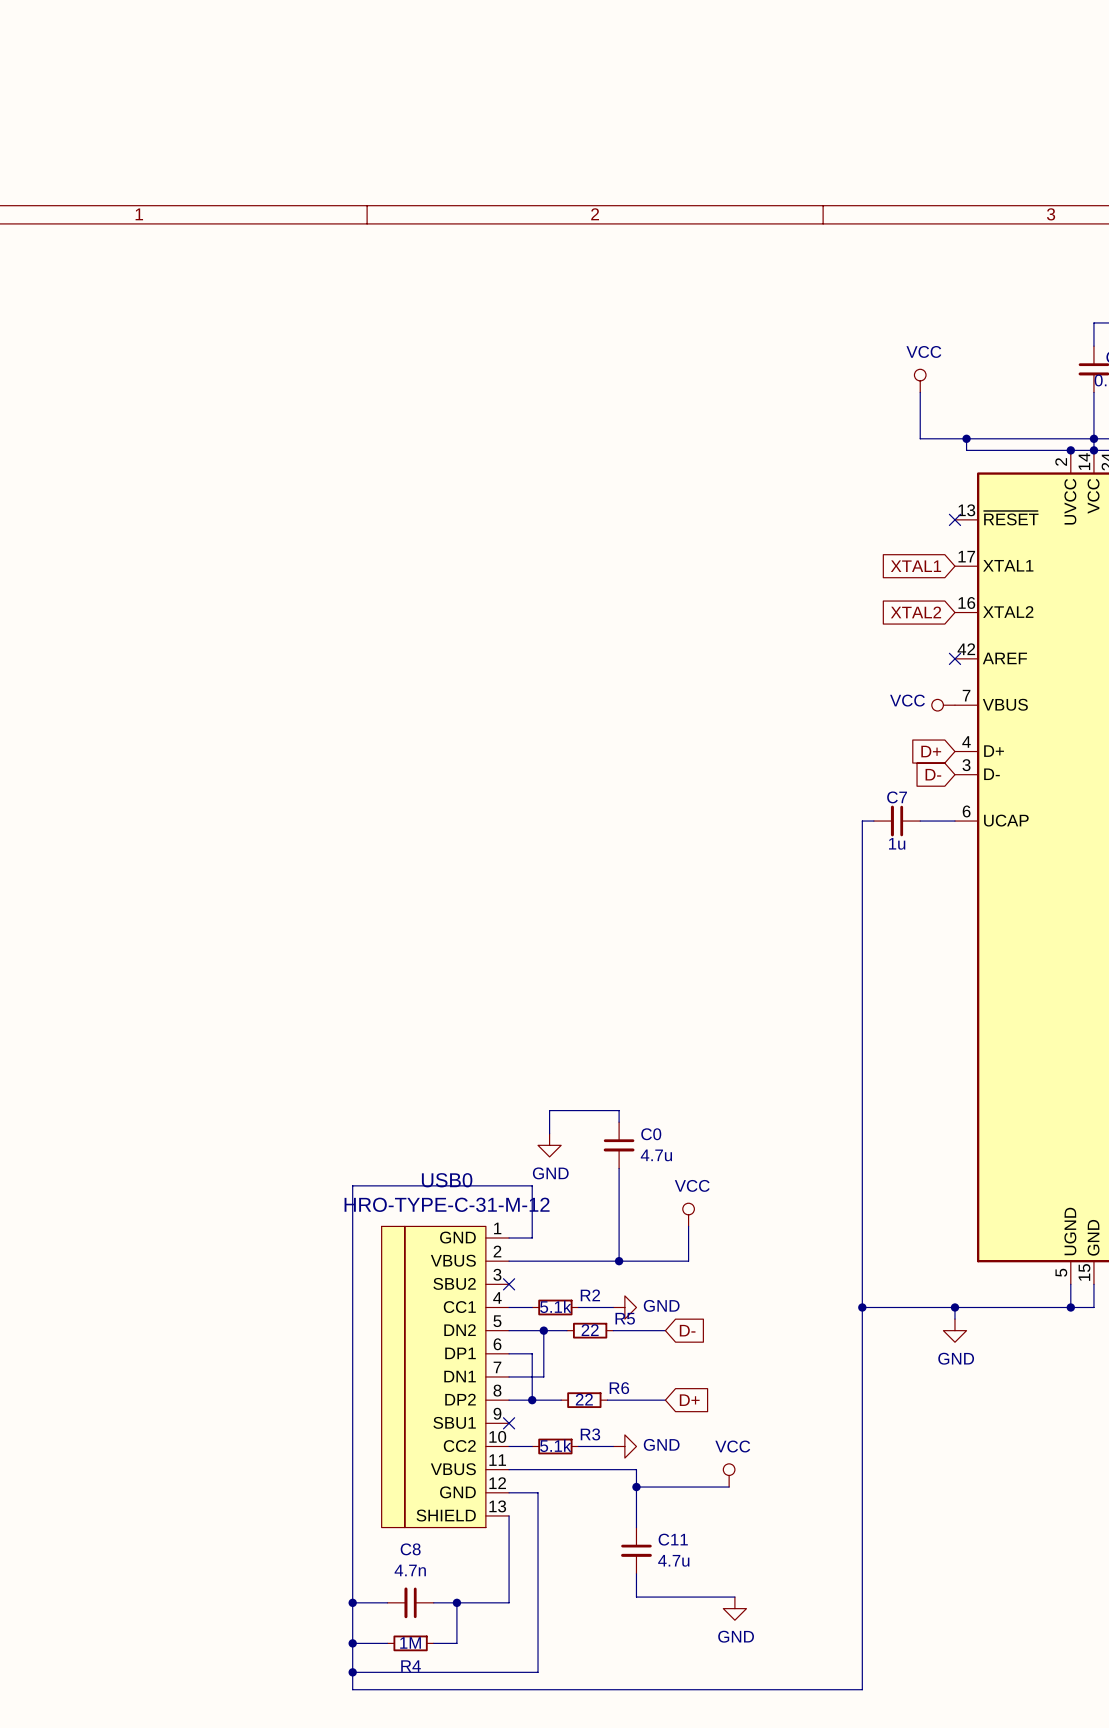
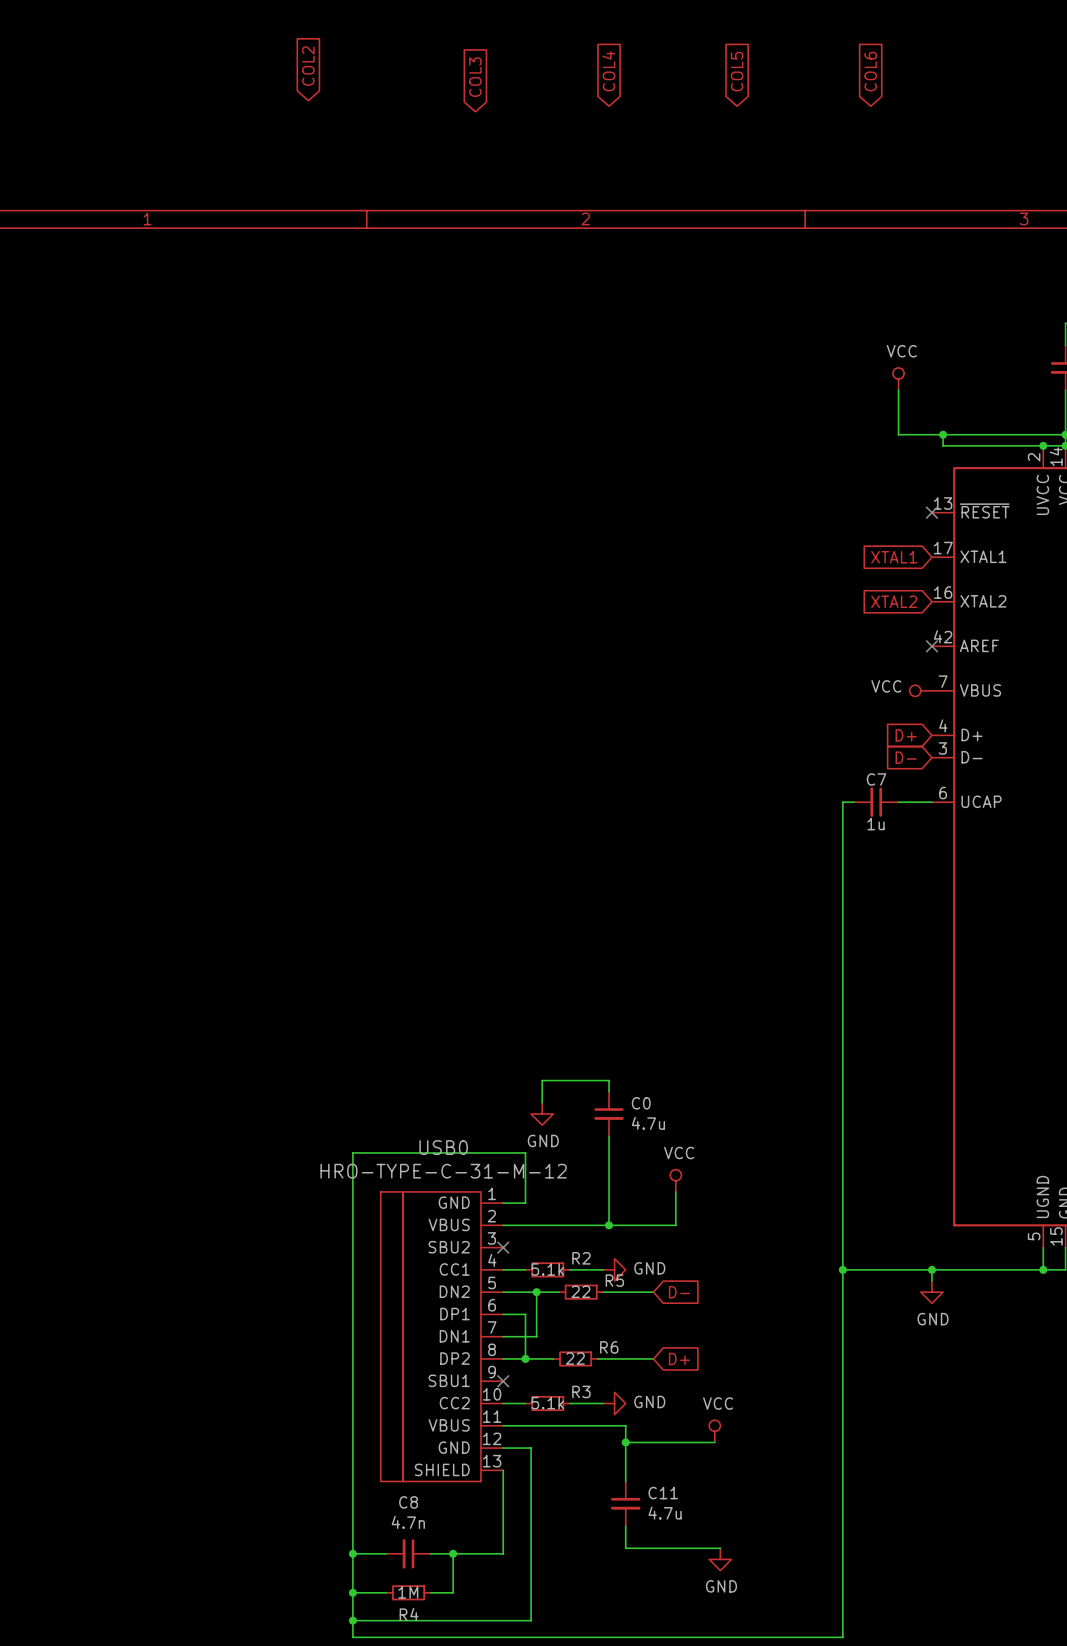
global label: none -> COL2 (308, 66)
global label: none -> COL4 (608, 71)
global label: none -> COL5 (737, 71)
global label: none -> COL6 (870, 71)
global label: none -> COL3 (475, 77)

